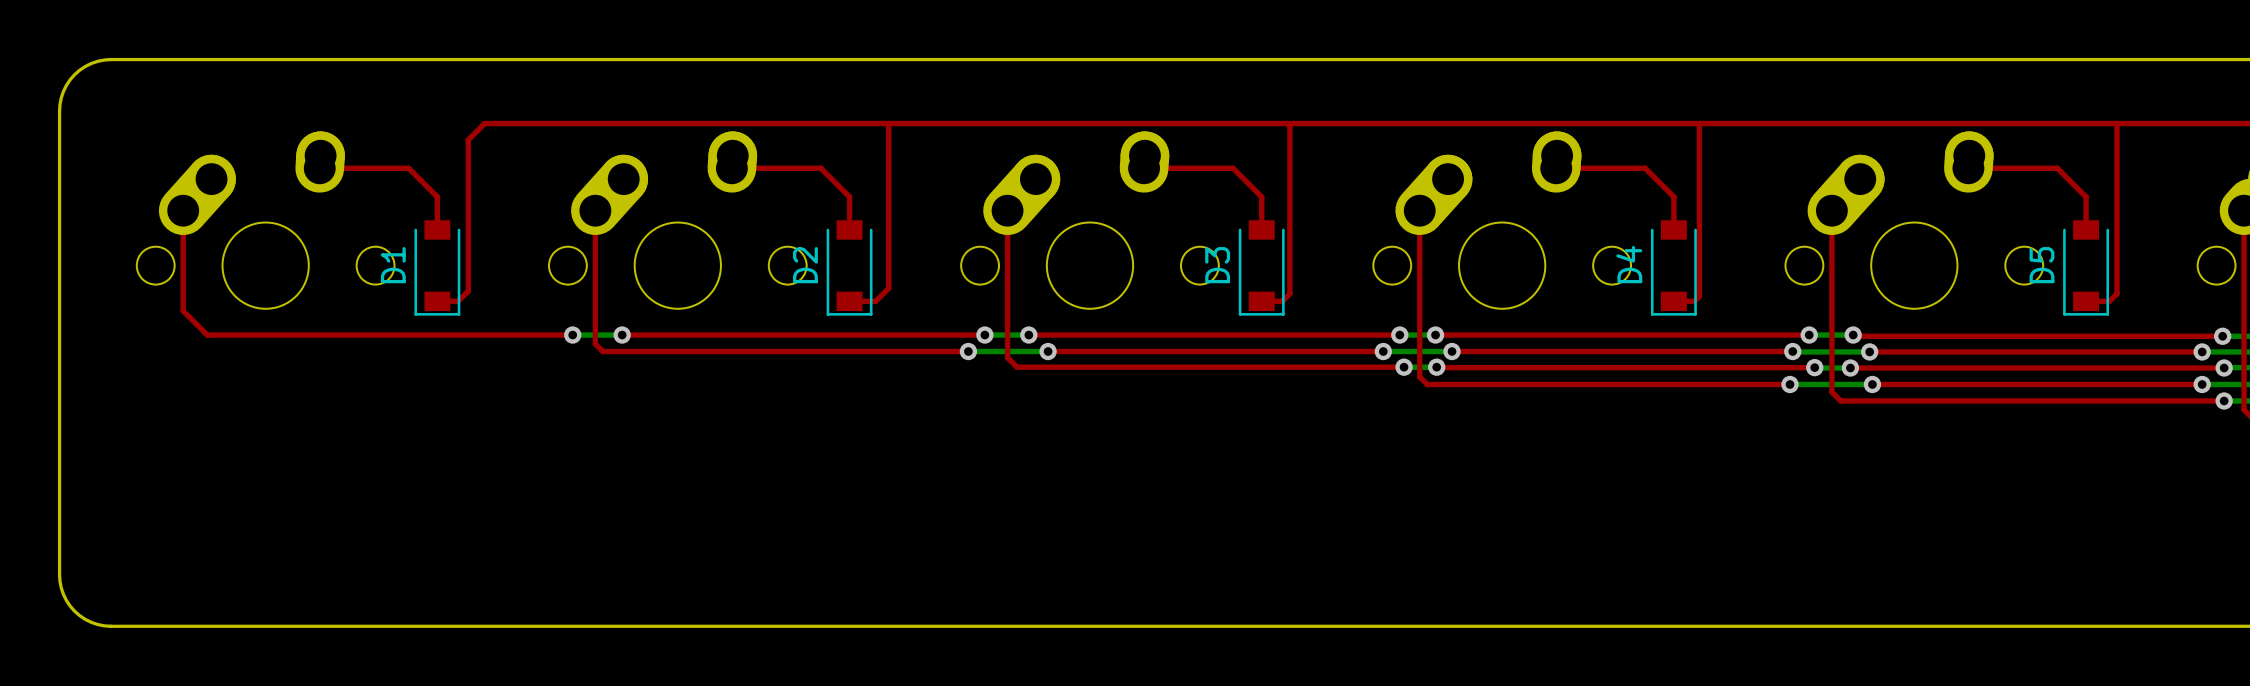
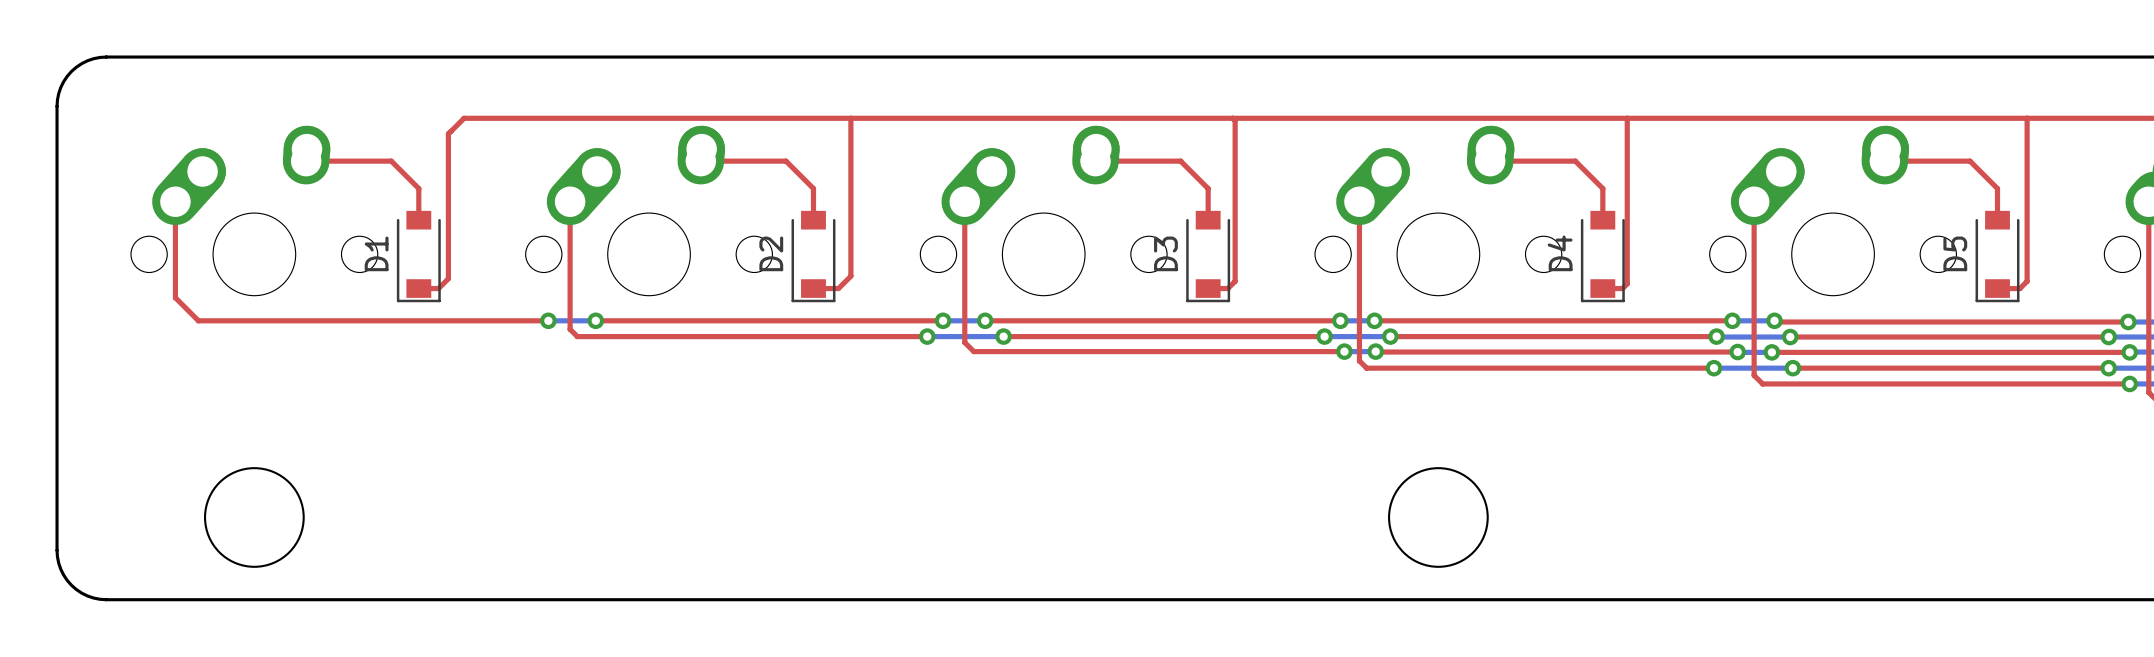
round board edge: none -> [204, 467, 305, 568]
round board edge: none -> [1388, 467, 1489, 568]

